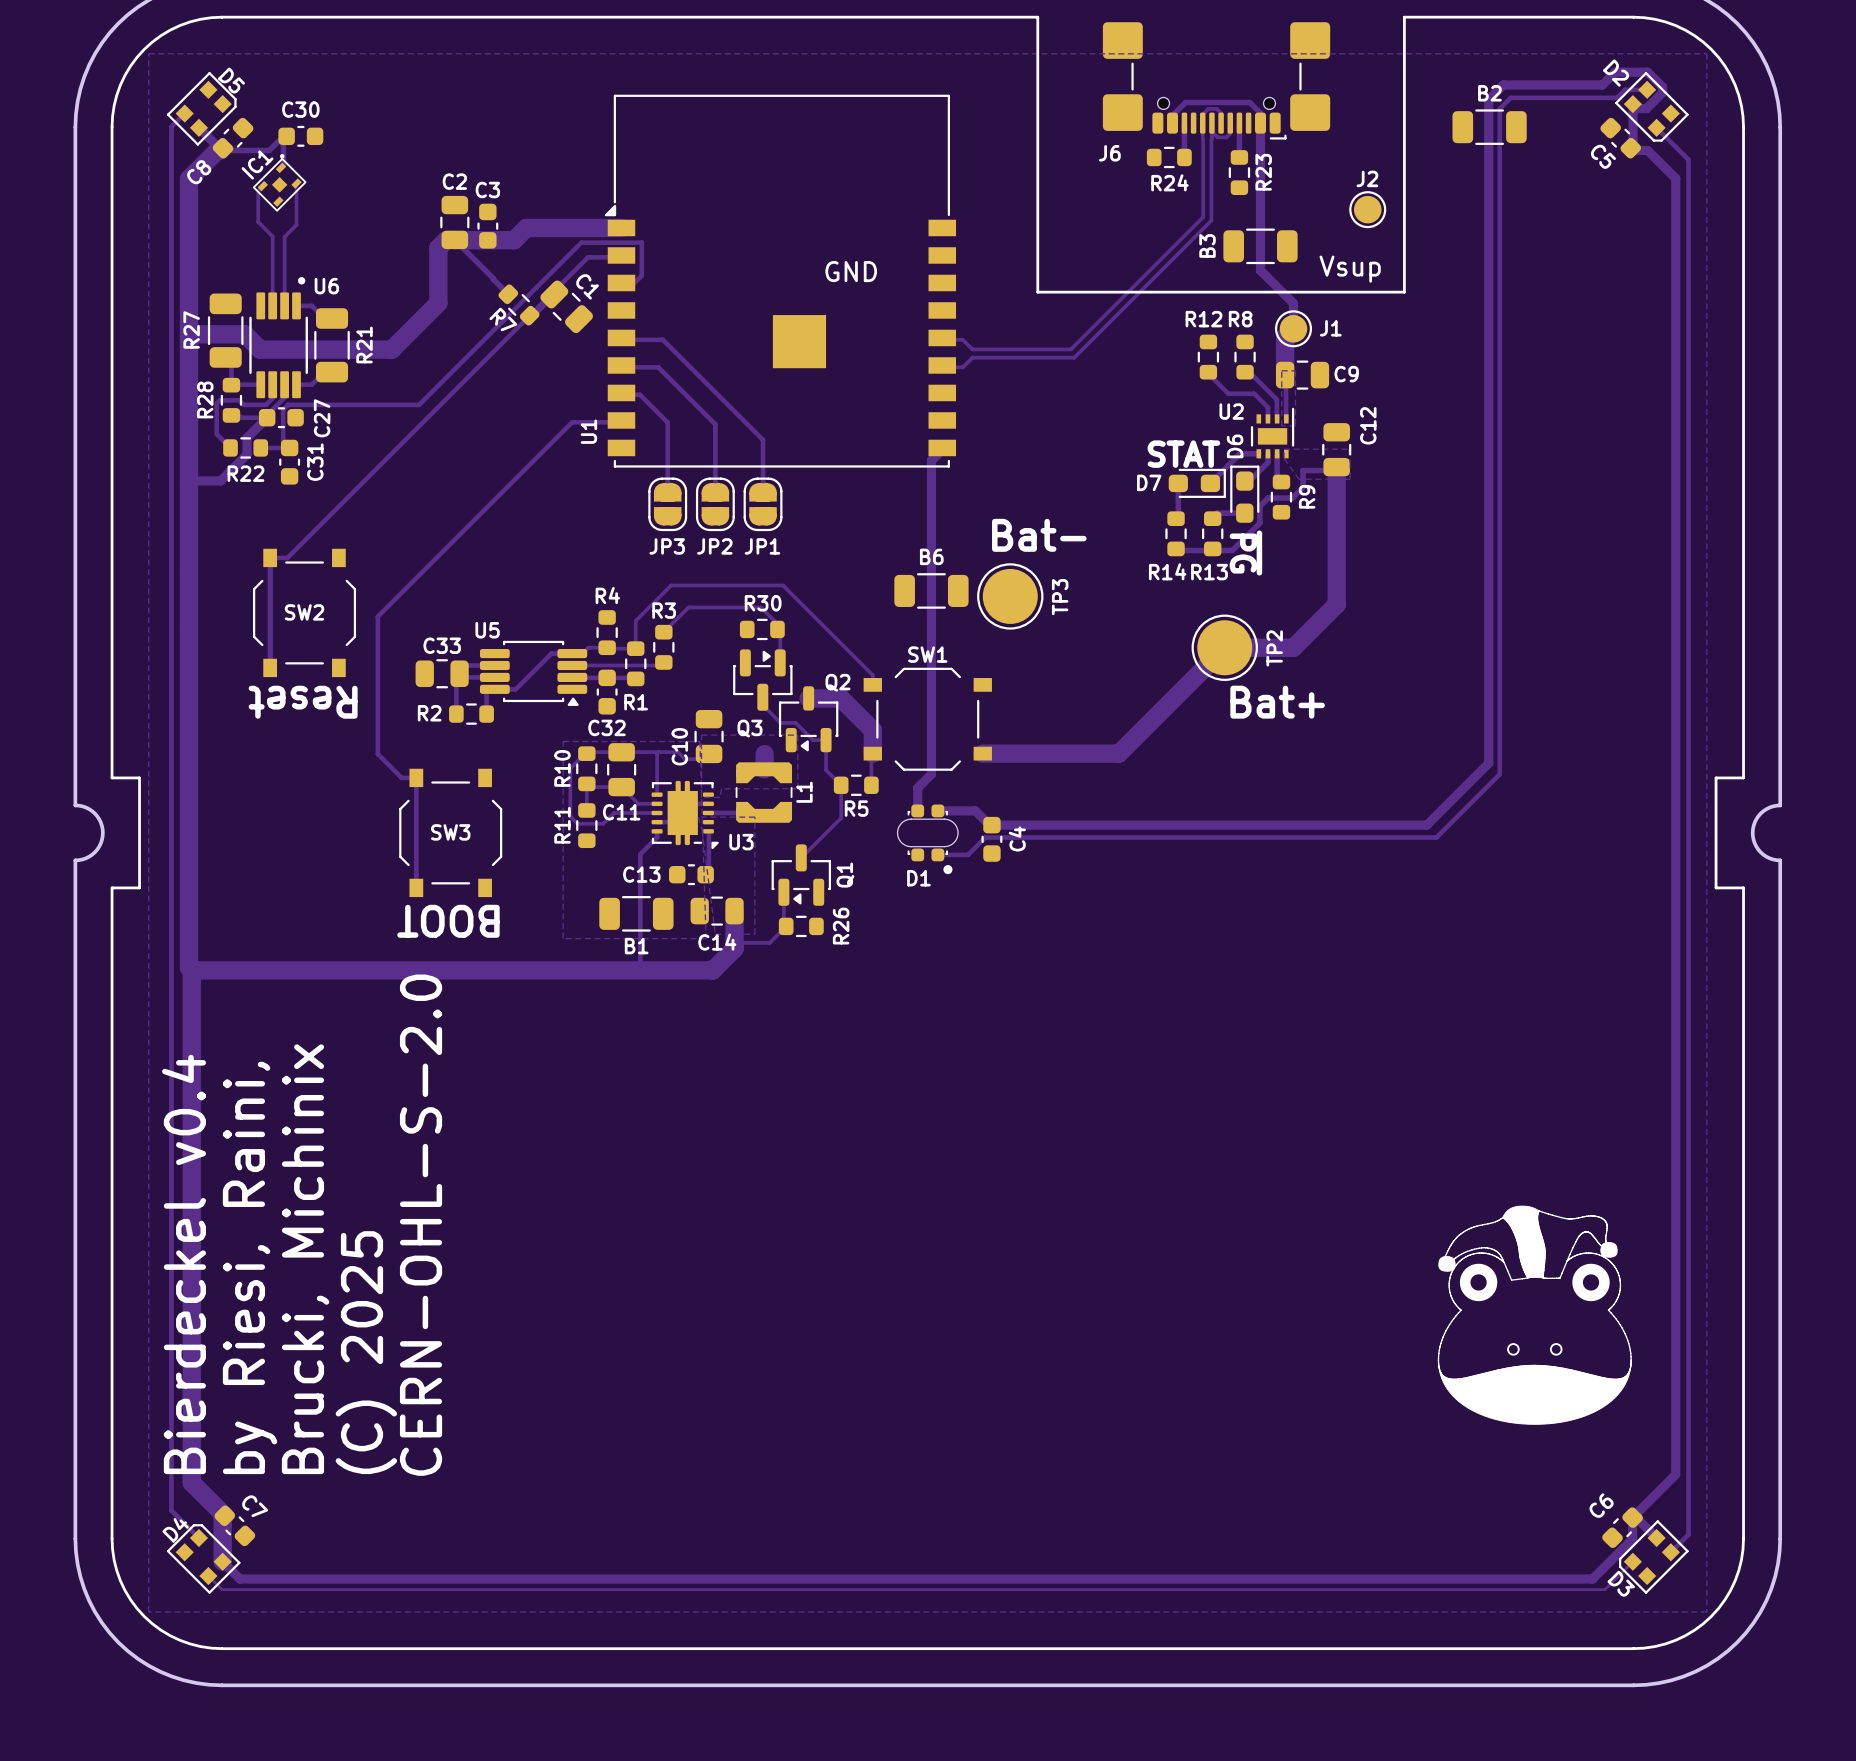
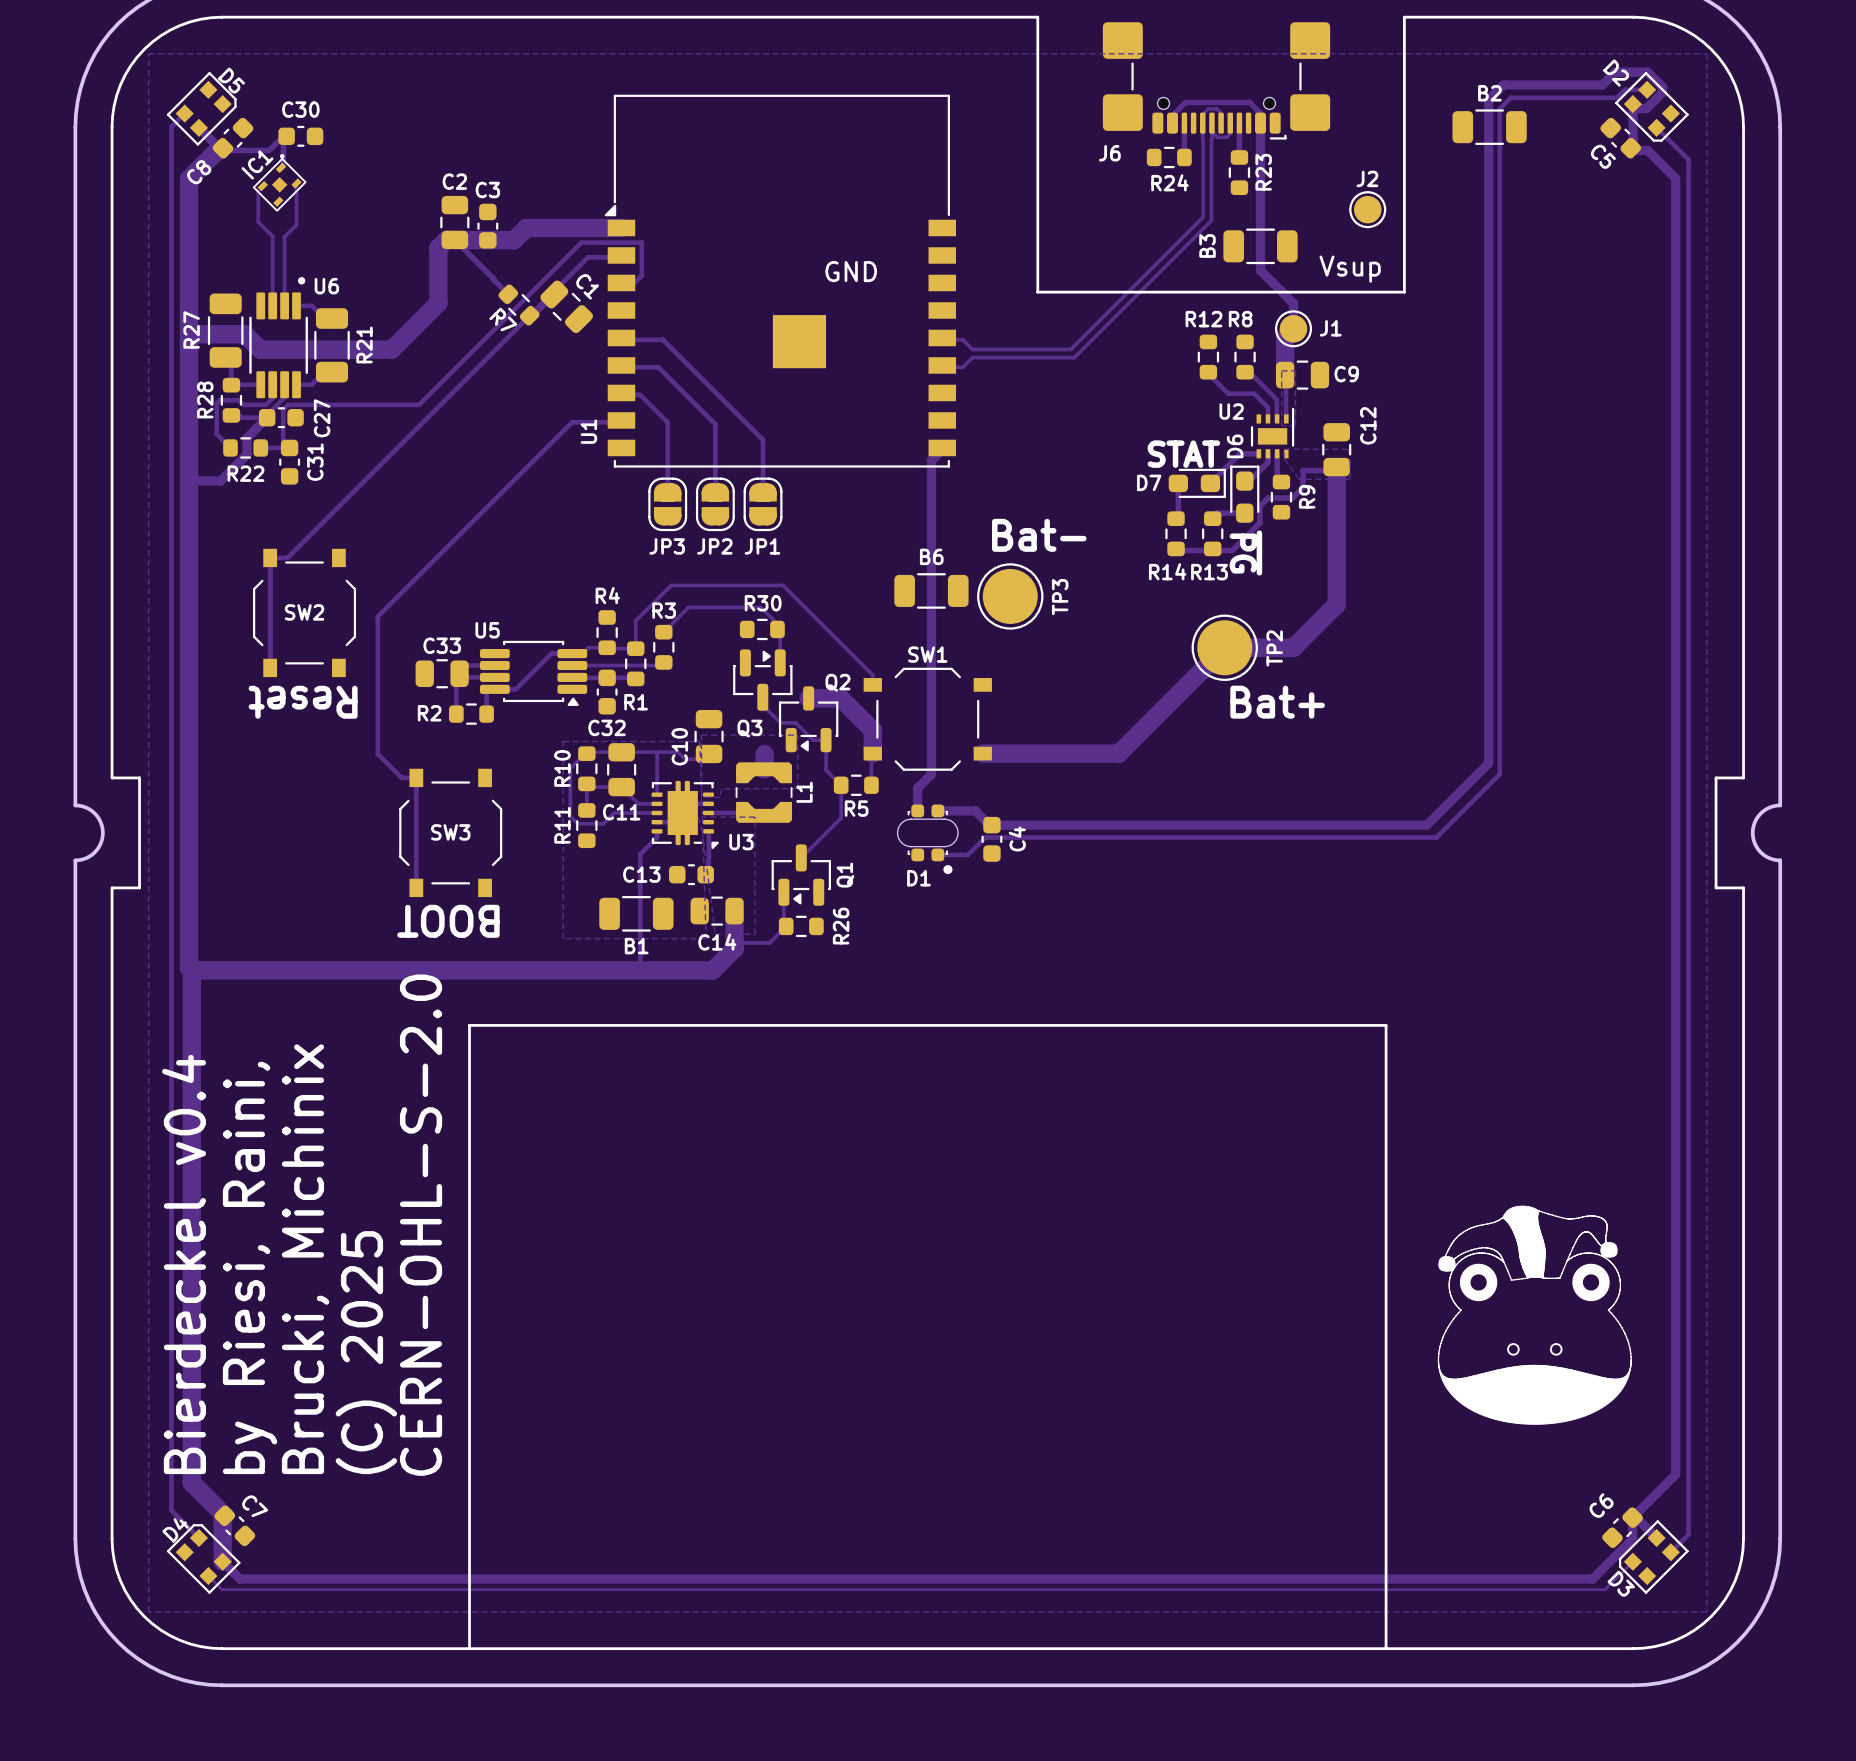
line: none -> (469, 1648) (469, 1025) (1386, 1025) (1386, 1648)

